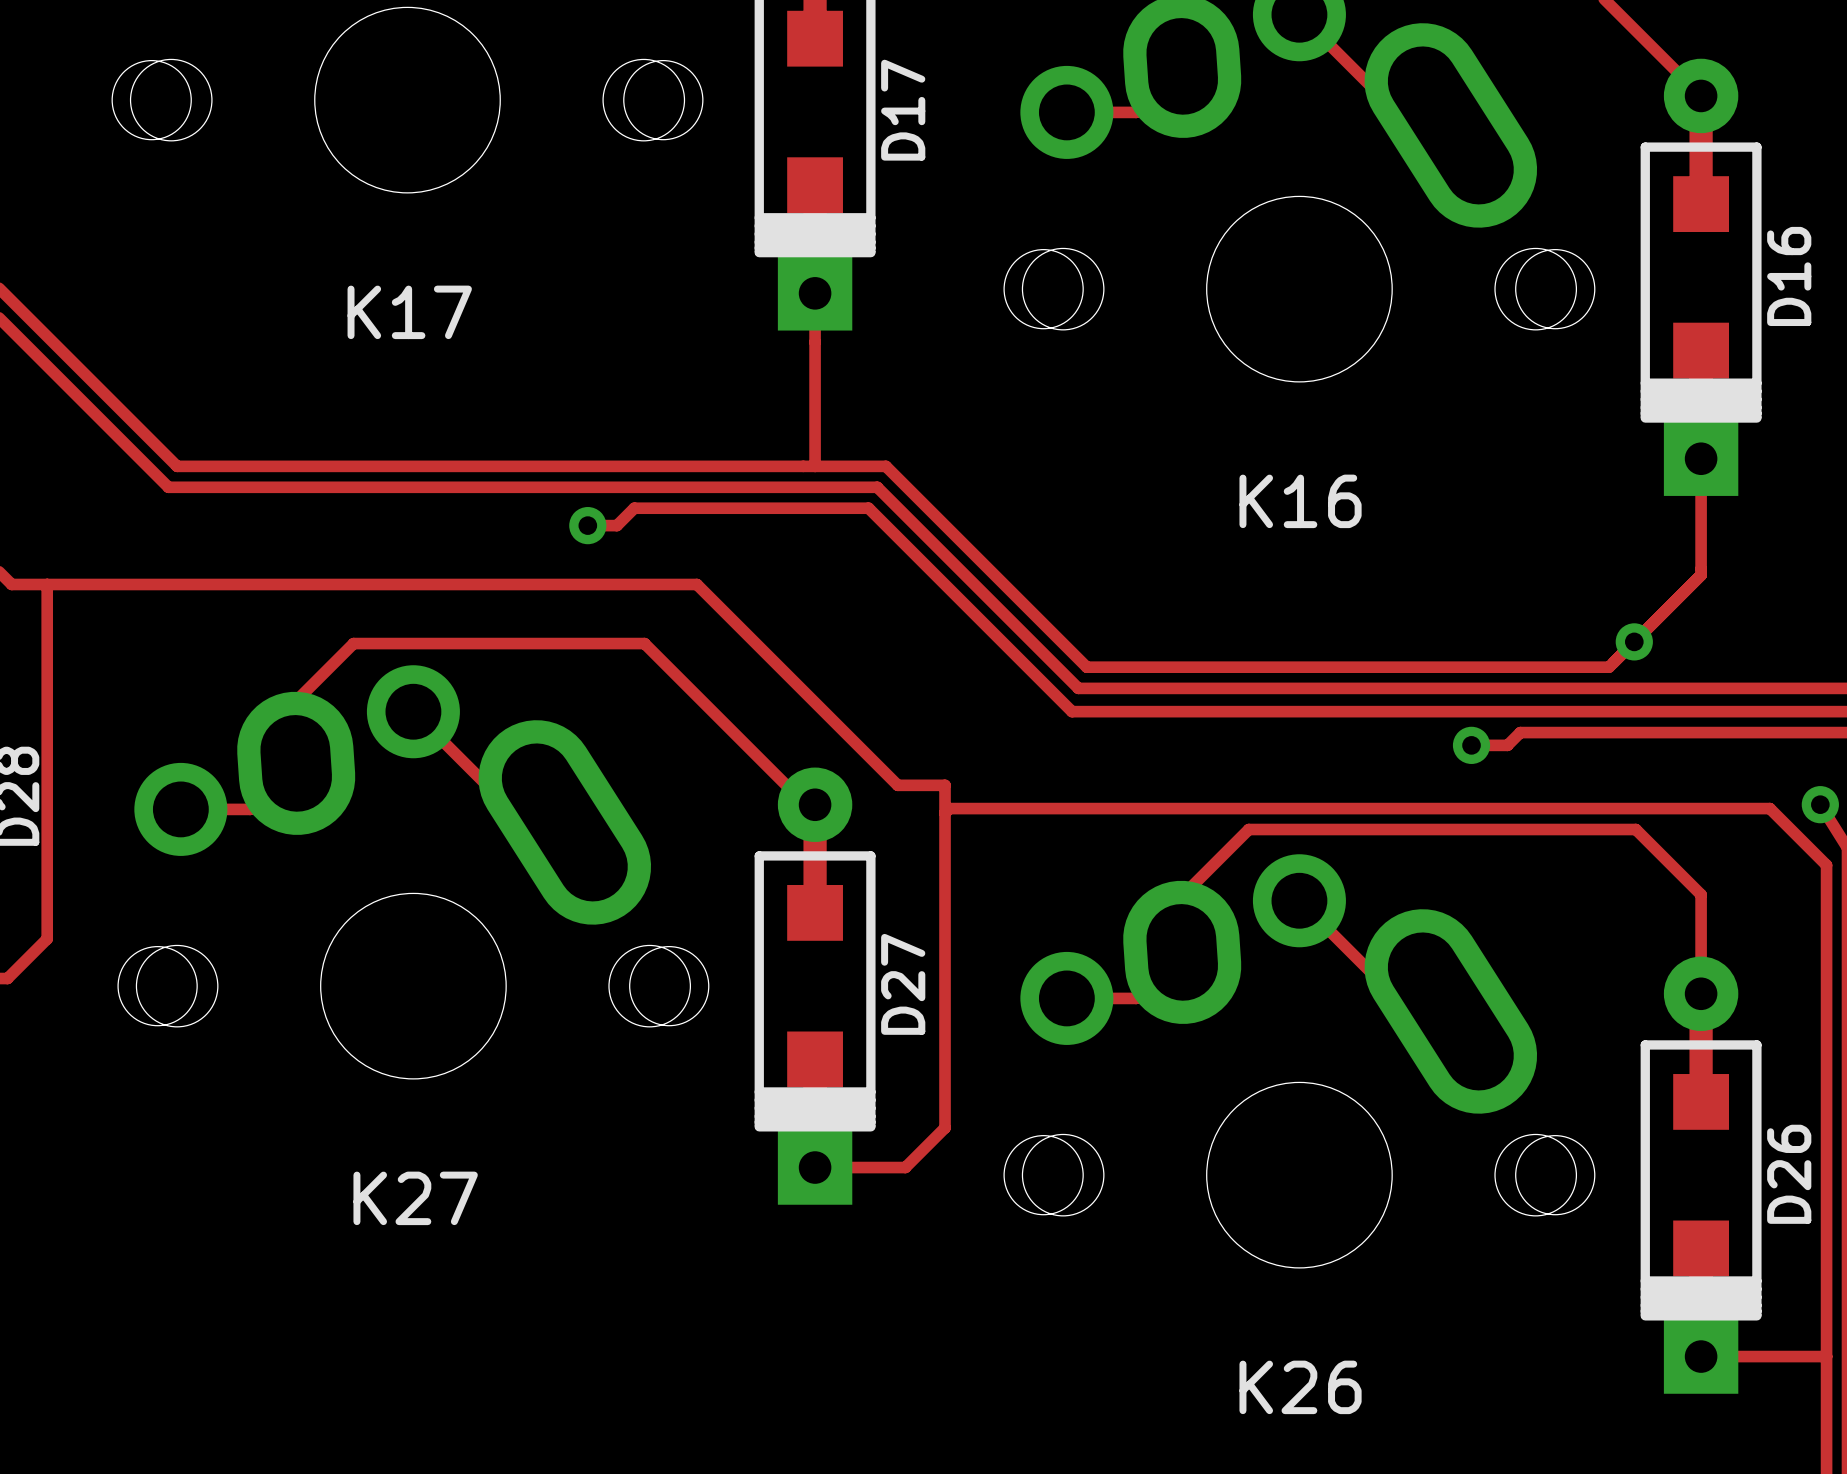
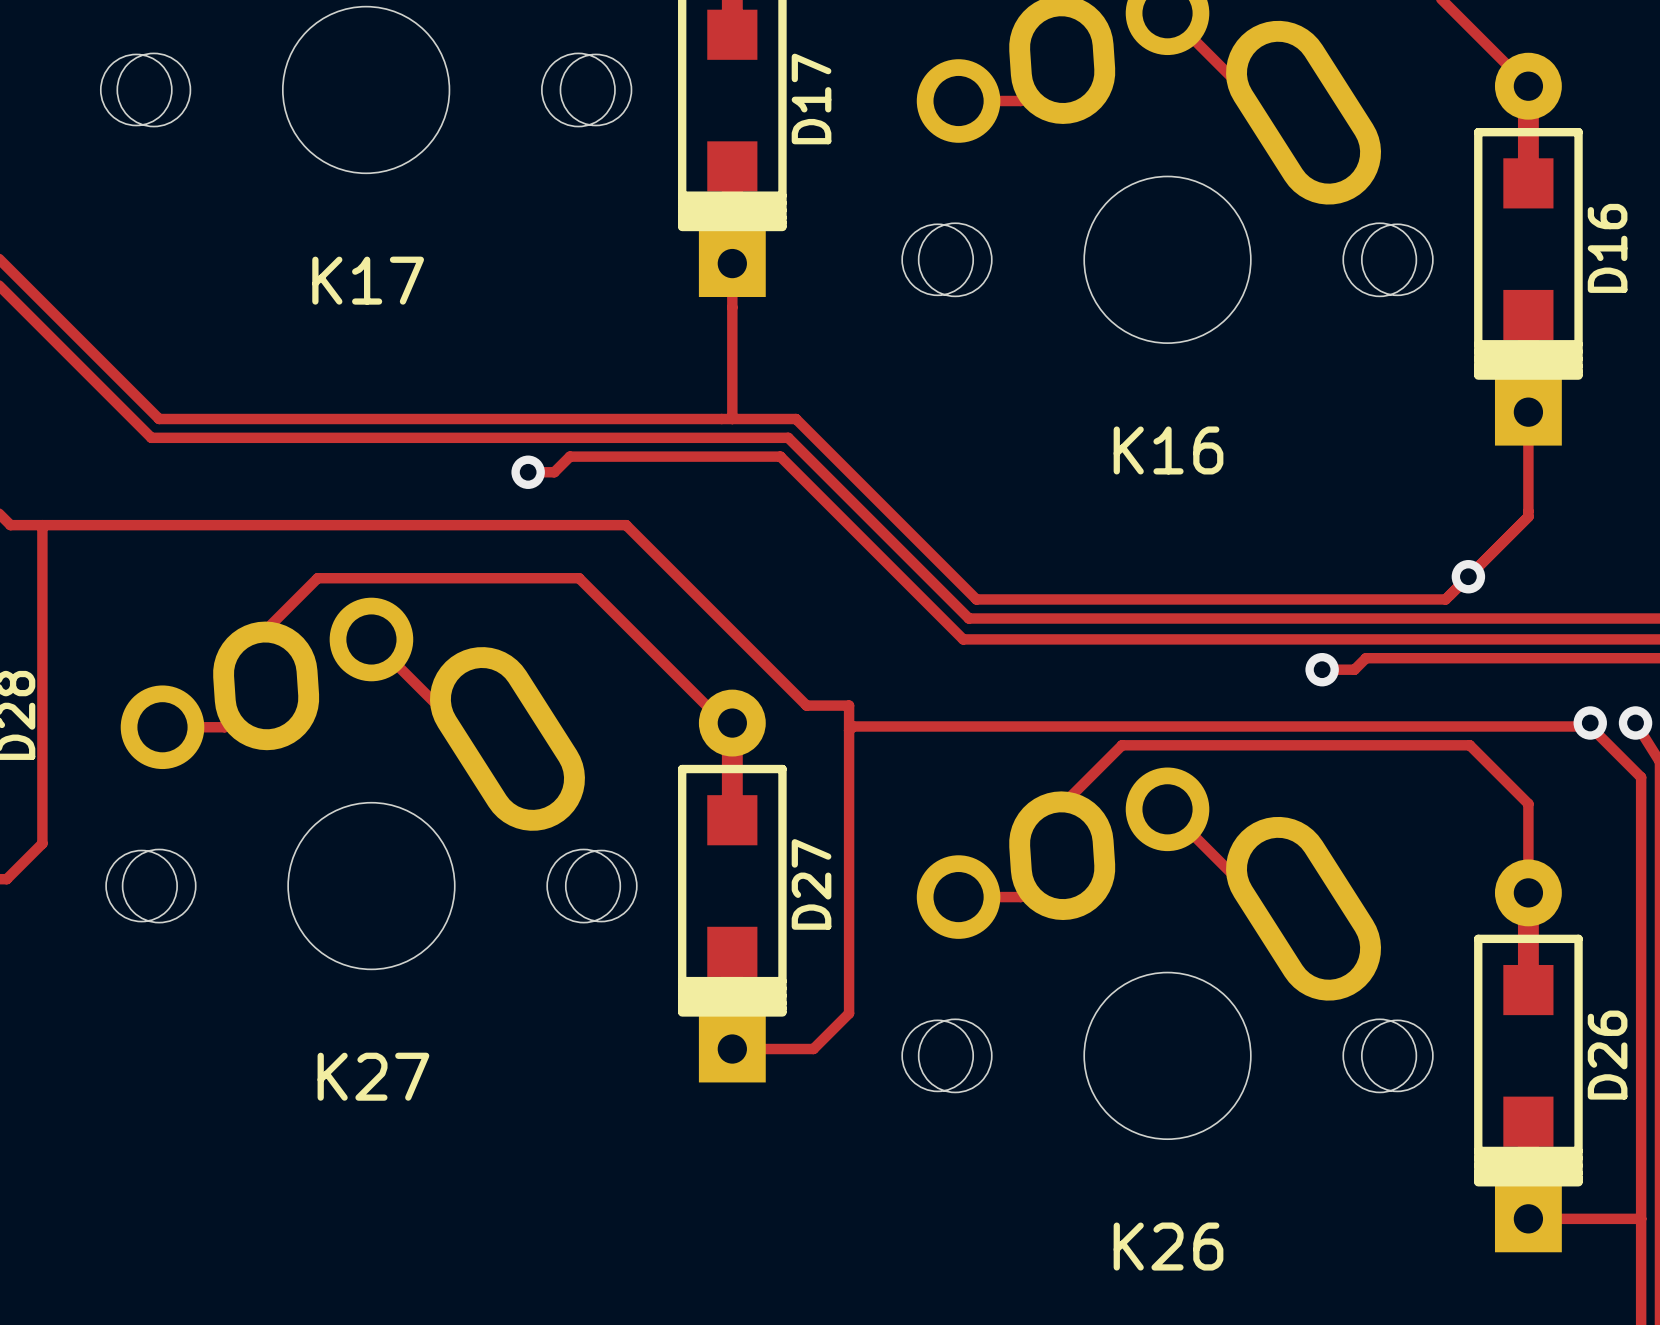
via: none -> (1590, 722)

